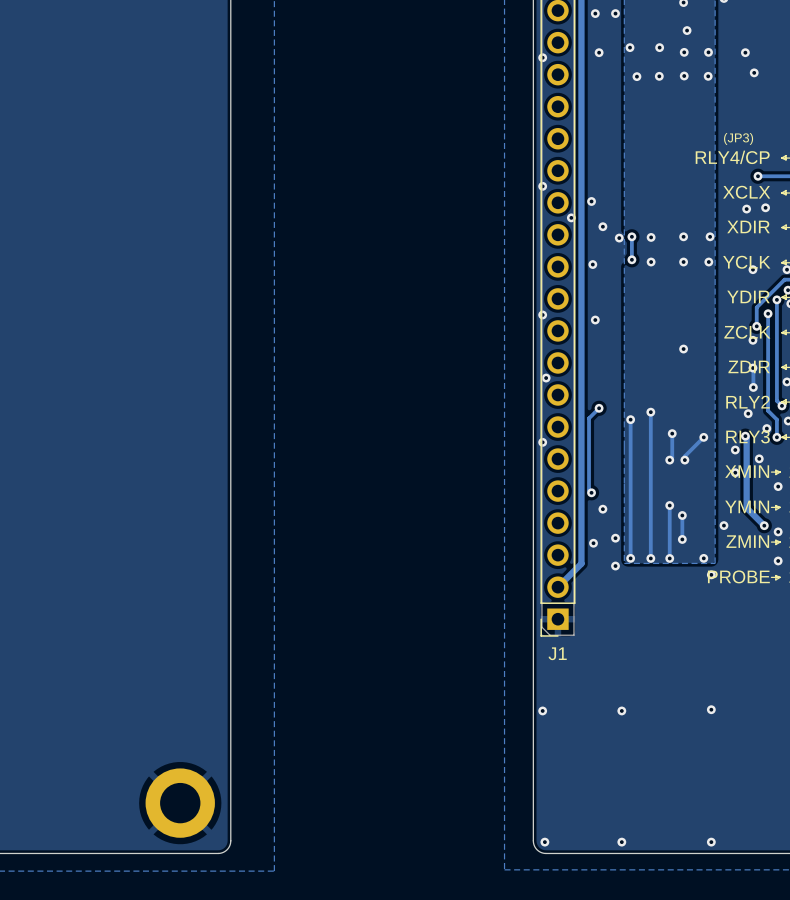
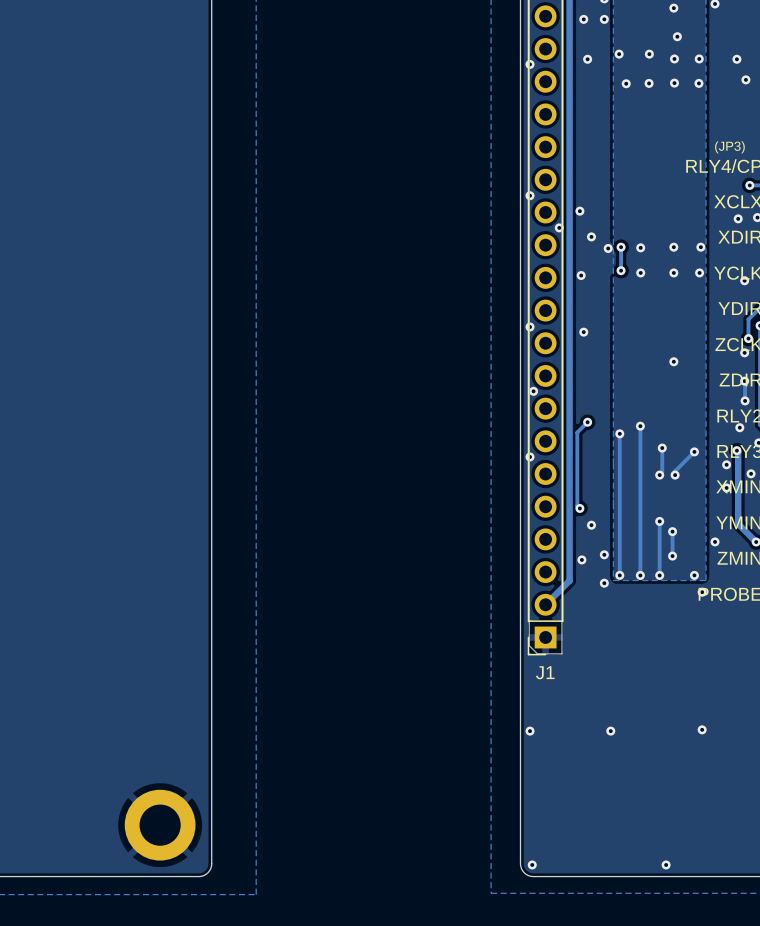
via: (621, 842) -> none
via: none -> (666, 864)
via: (711, 842) -> none

